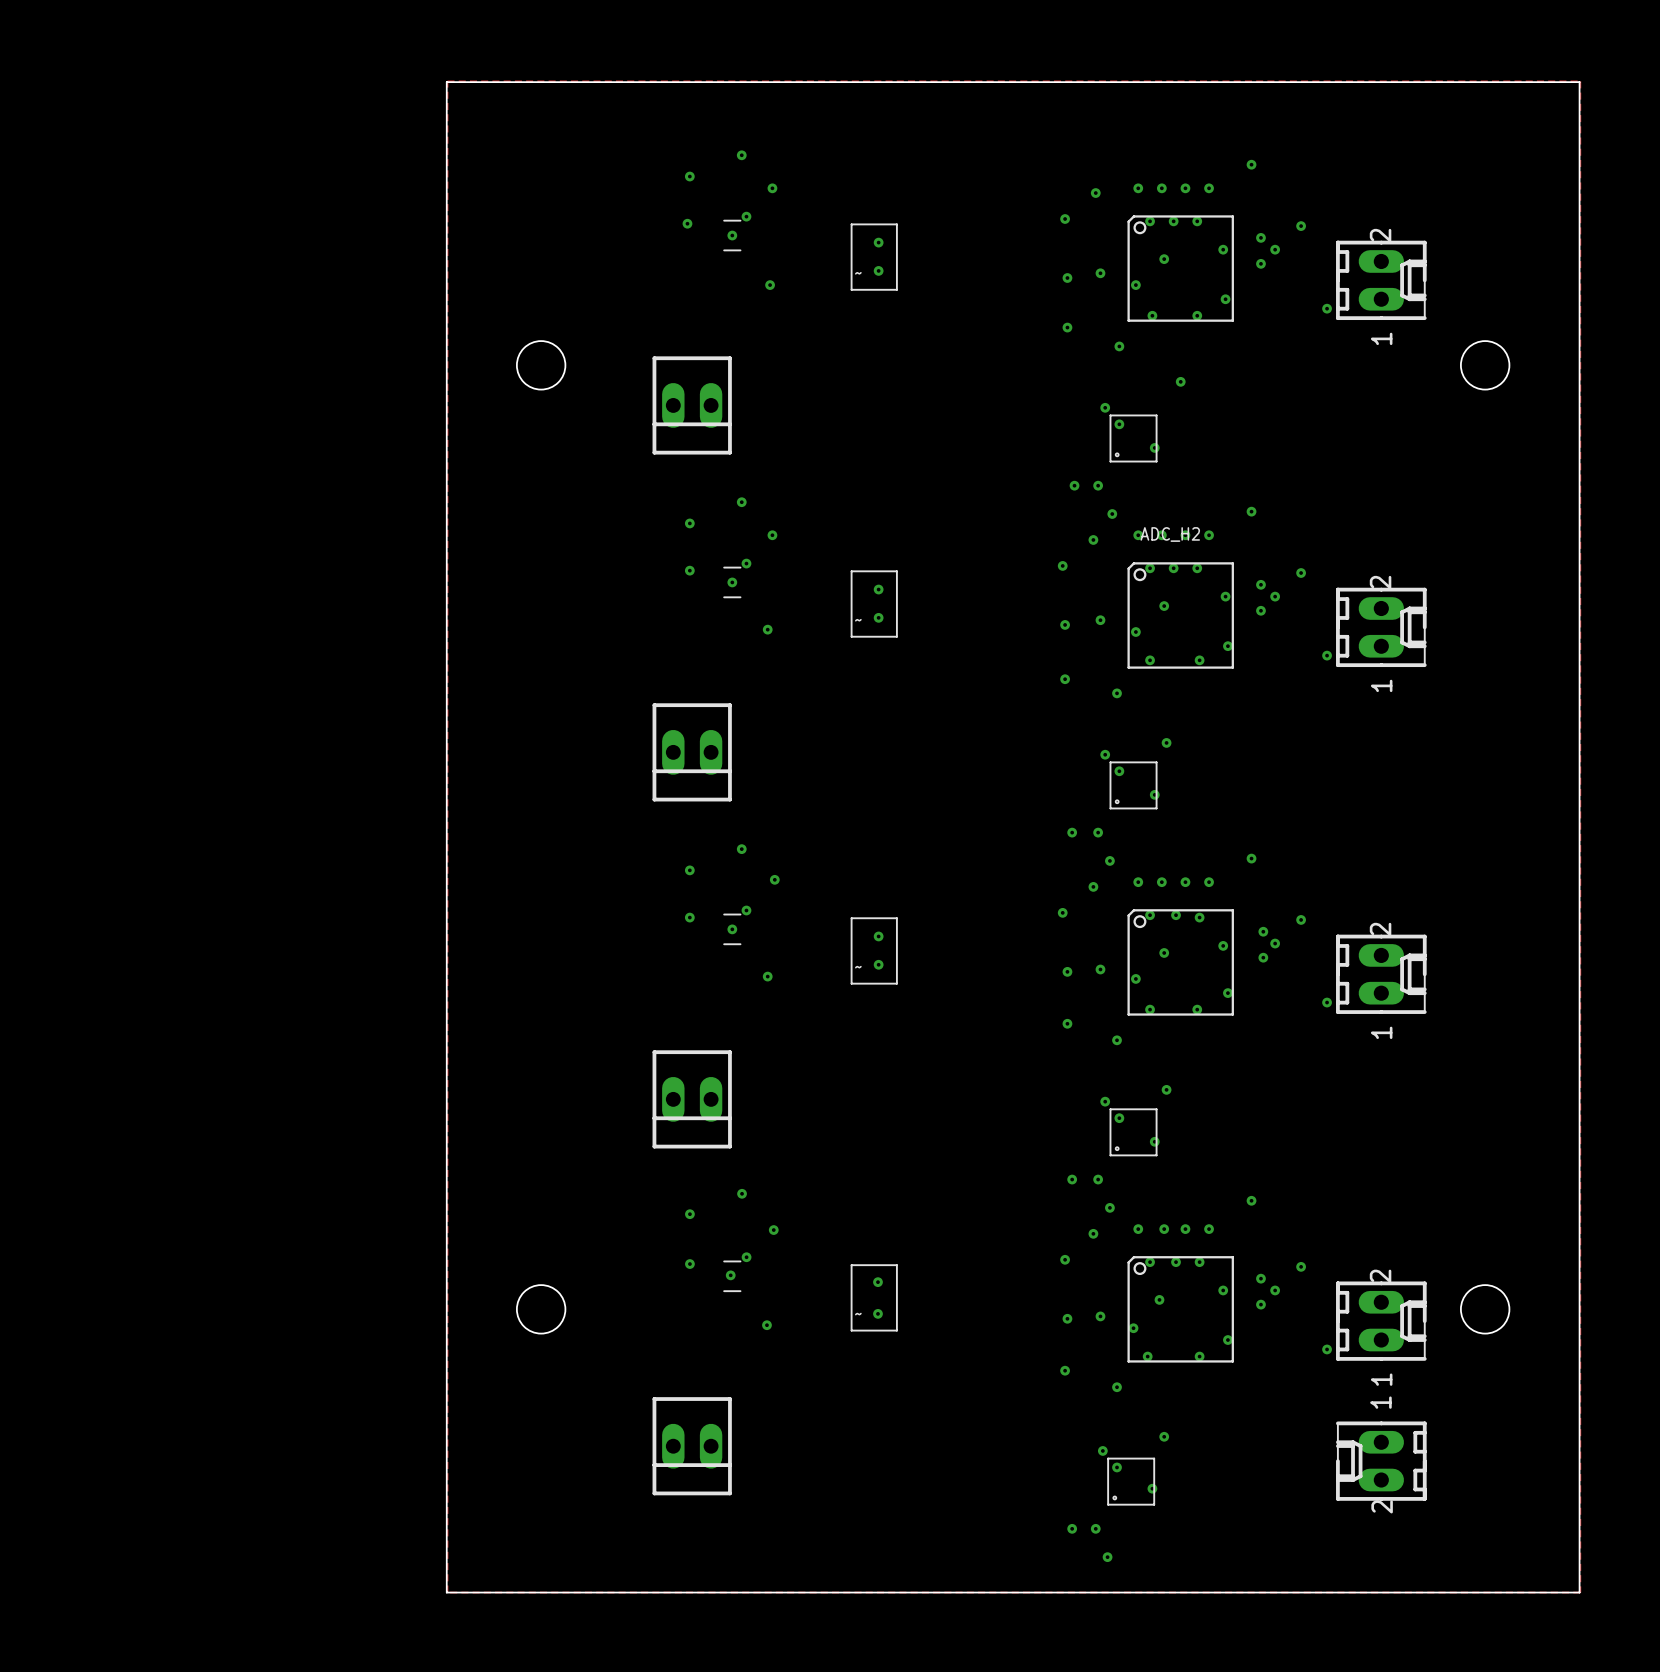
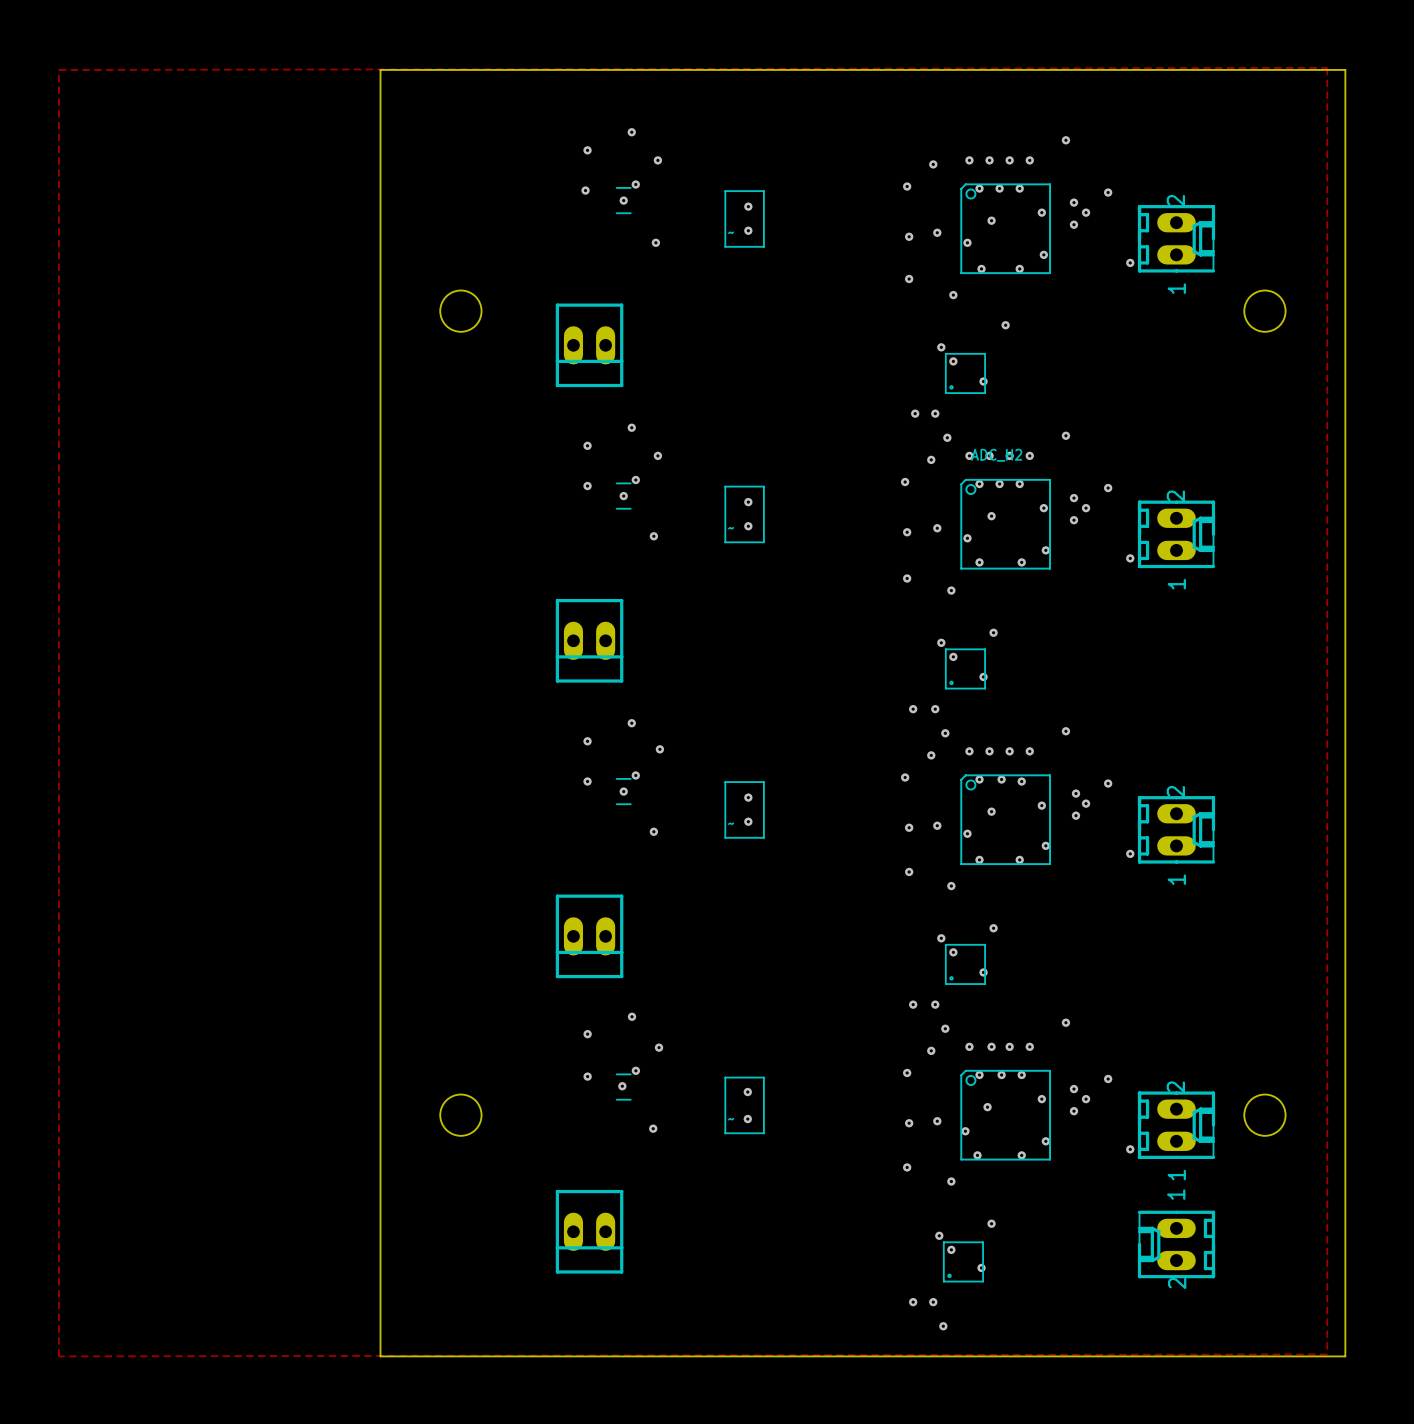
zone outline: (447, 81) (1580, 81) (1580, 1592) (447, 1592) (447, 81) -> (1327, 67) (58, 69) (58, 1356) (1327, 1354) (1327, 67)

